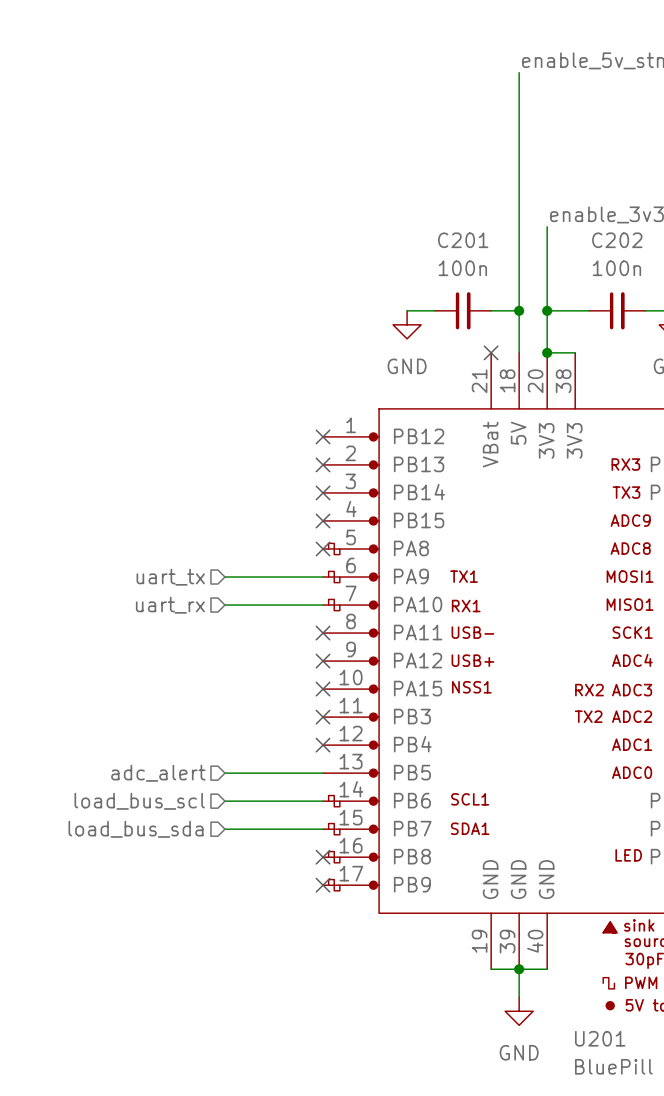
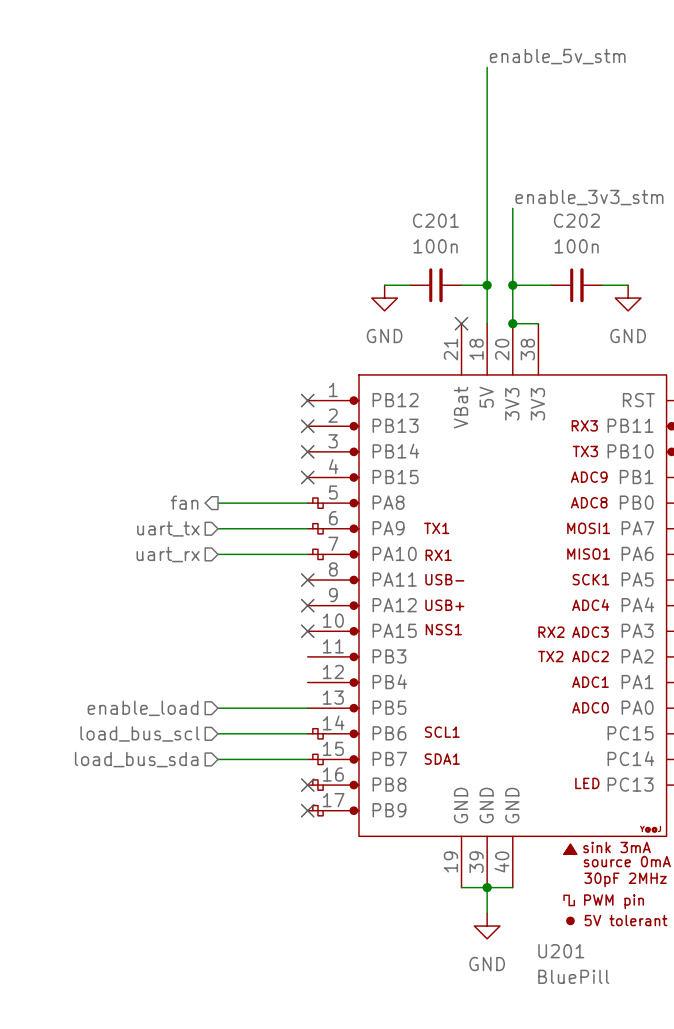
hierarchical label: none -> fan (184, 502)
wire: none -> (218, 503) (307, 503)
no-connect mark: (323, 548) -> none
no-connect mark: (323, 717) -> none
no-connect mark: (323, 745) -> none
hierarchical label: adc_alert (158, 773) -> enable_load (143, 708)

